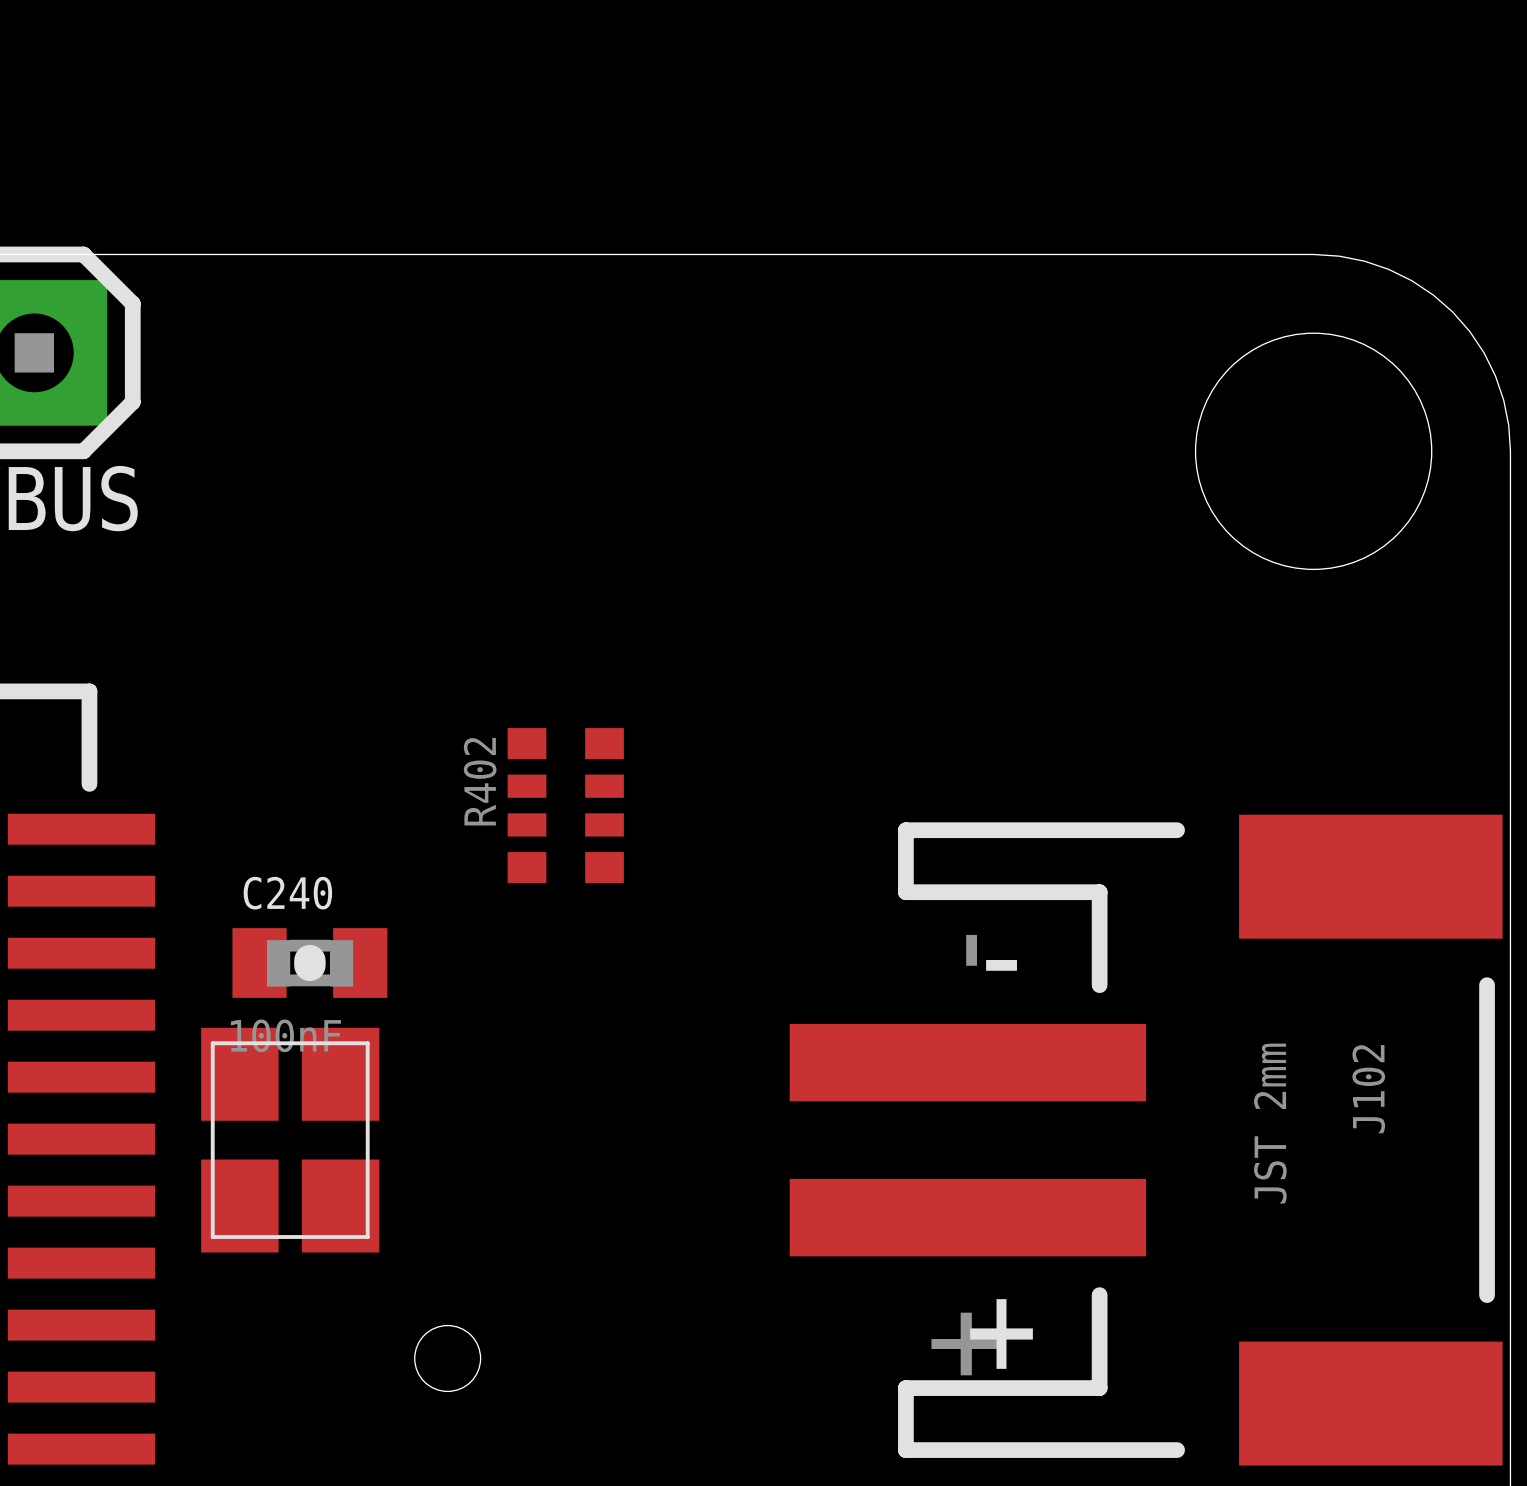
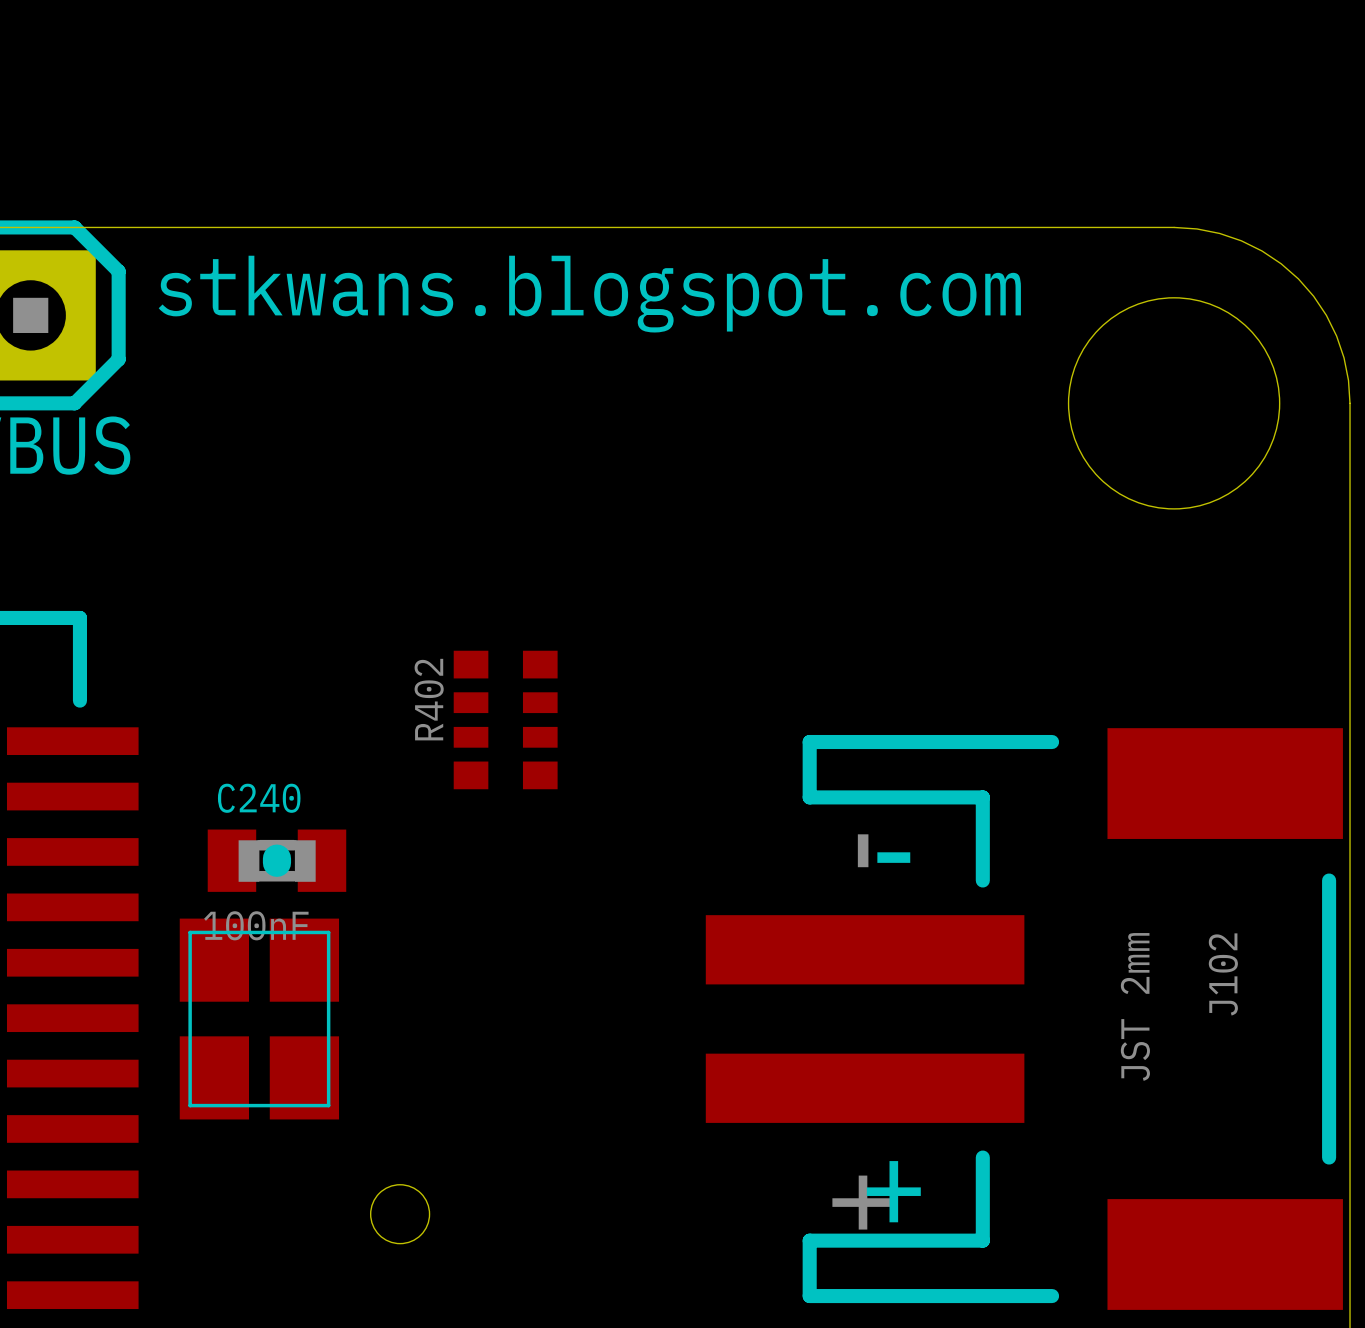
text: none -> stkwans.blogspot.com (589, 294)

